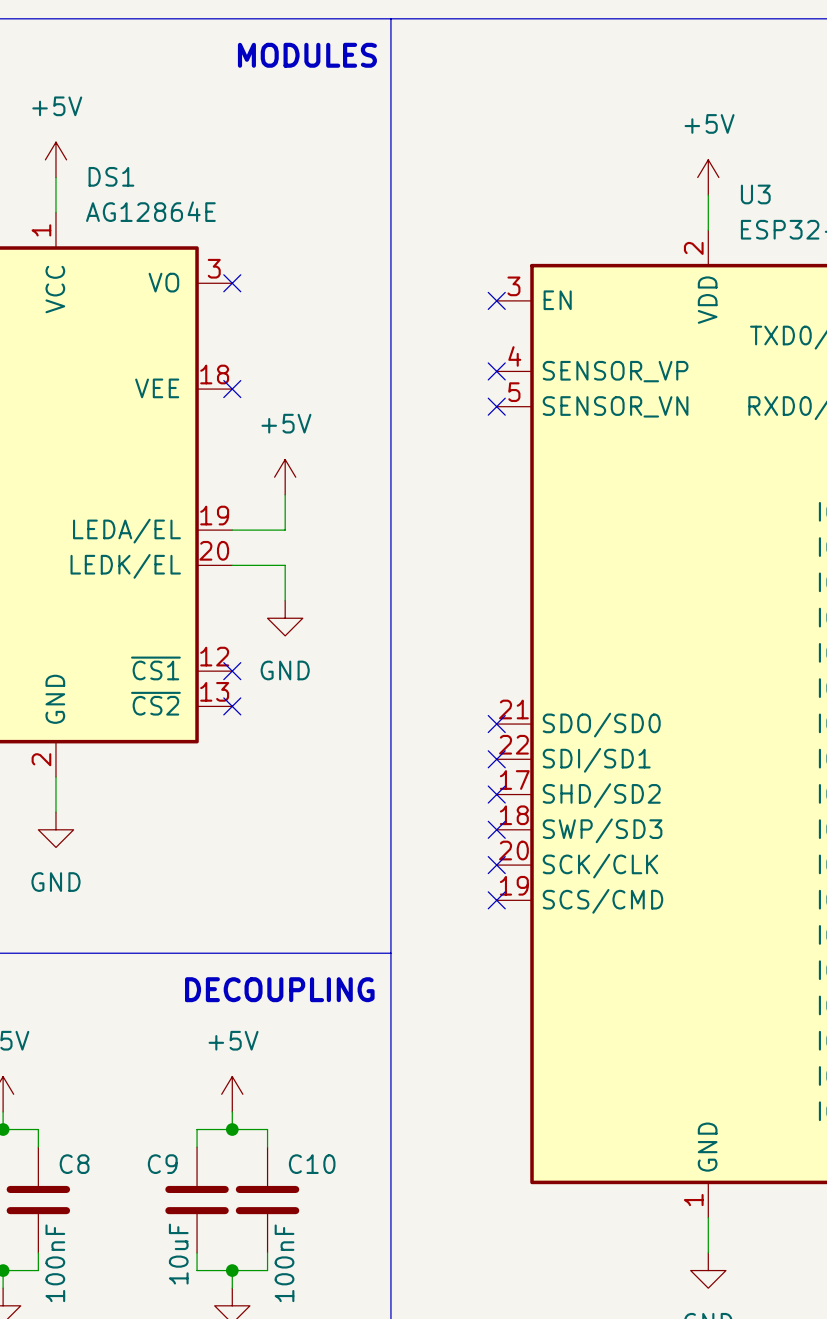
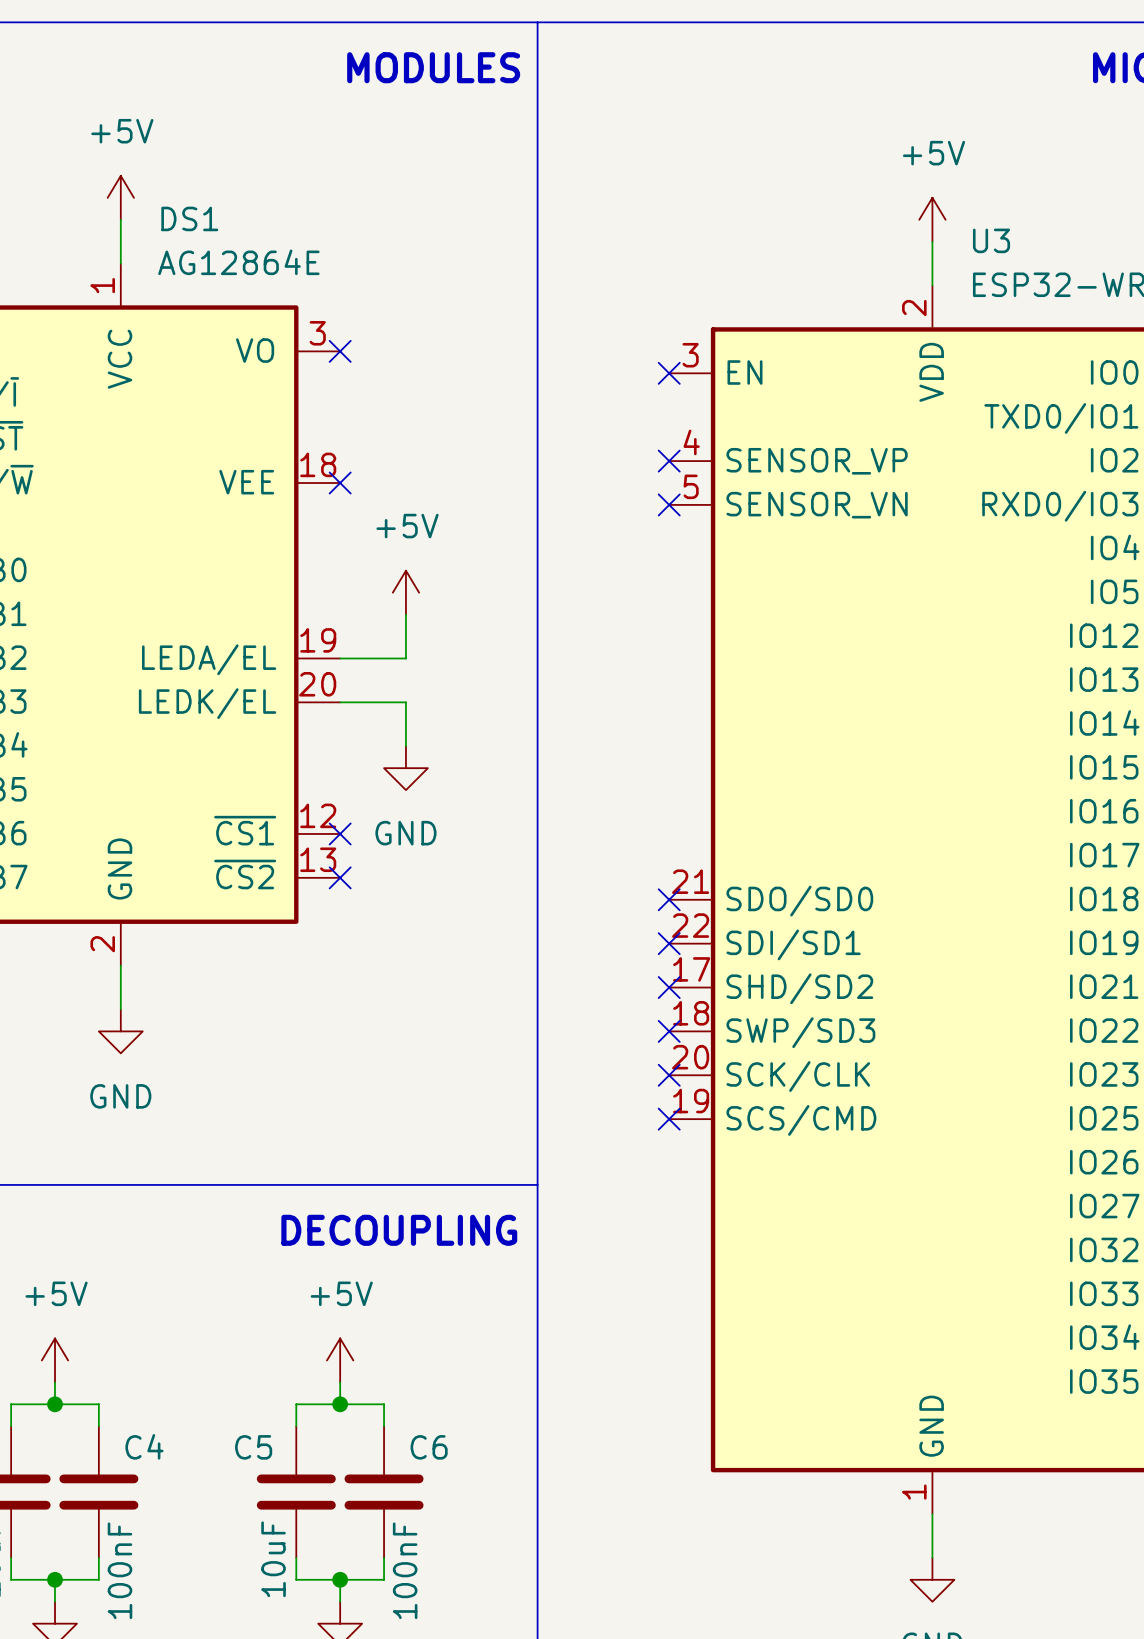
C8 name: C8 (74, 1164) -> C4 (144, 1446)
C9 name: C9 (162, 1164) -> C5 (253, 1447)
C10 name: C10 (312, 1164) -> C6 (429, 1447)

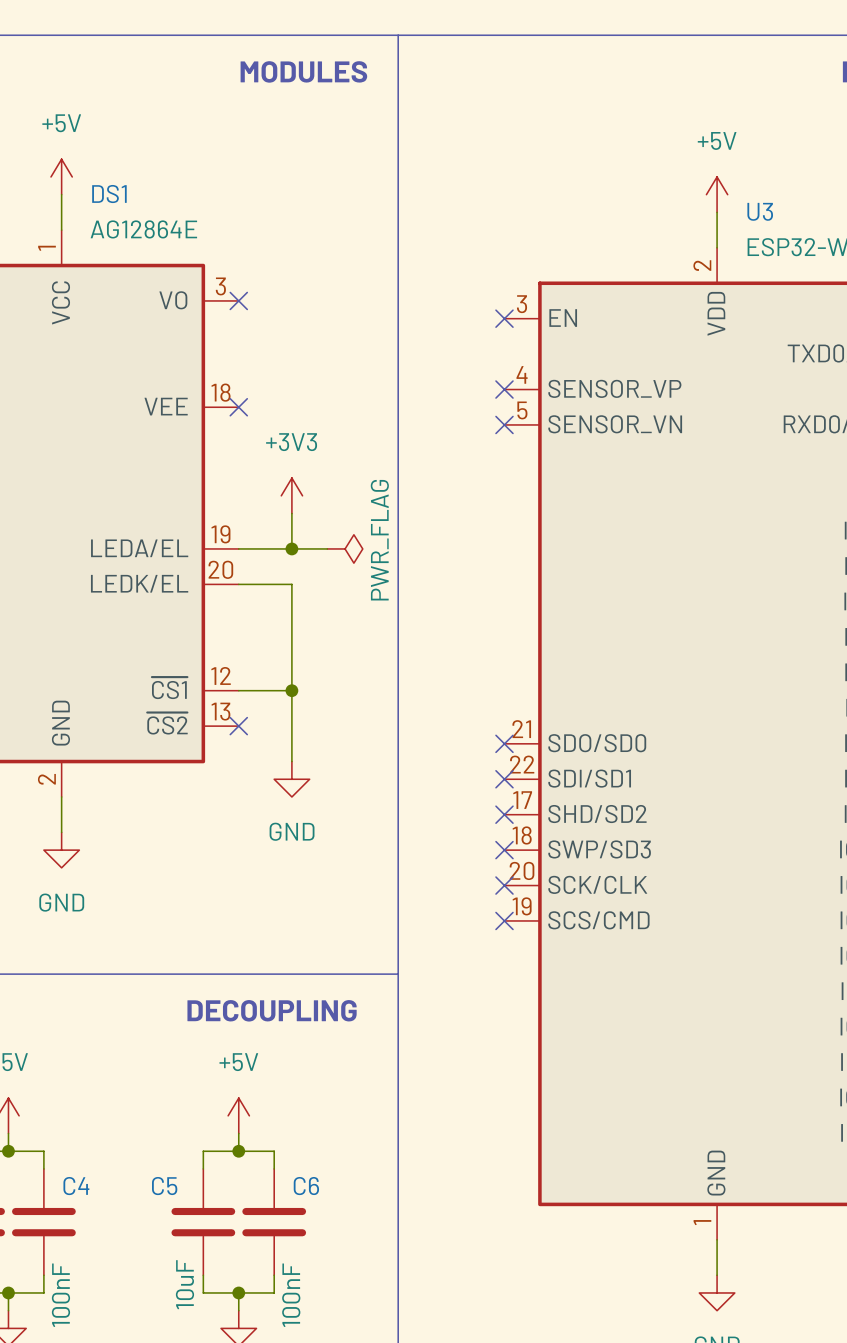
power symbol: +5V (405, 592) -> +3V3 (291, 495)
wire: none -> (291, 548) (327, 548)
junction: none -> (291, 548)
power symbol: none -> PWR_FLAG (345, 548)
wire: none -> (291, 619) (291, 761)
power symbol position: GND (405, 768) -> GND (291, 779)
wire: none -> (238, 690) (291, 690)
no-connect mark: (340, 833) -> none
junction: none -> (291, 690)

